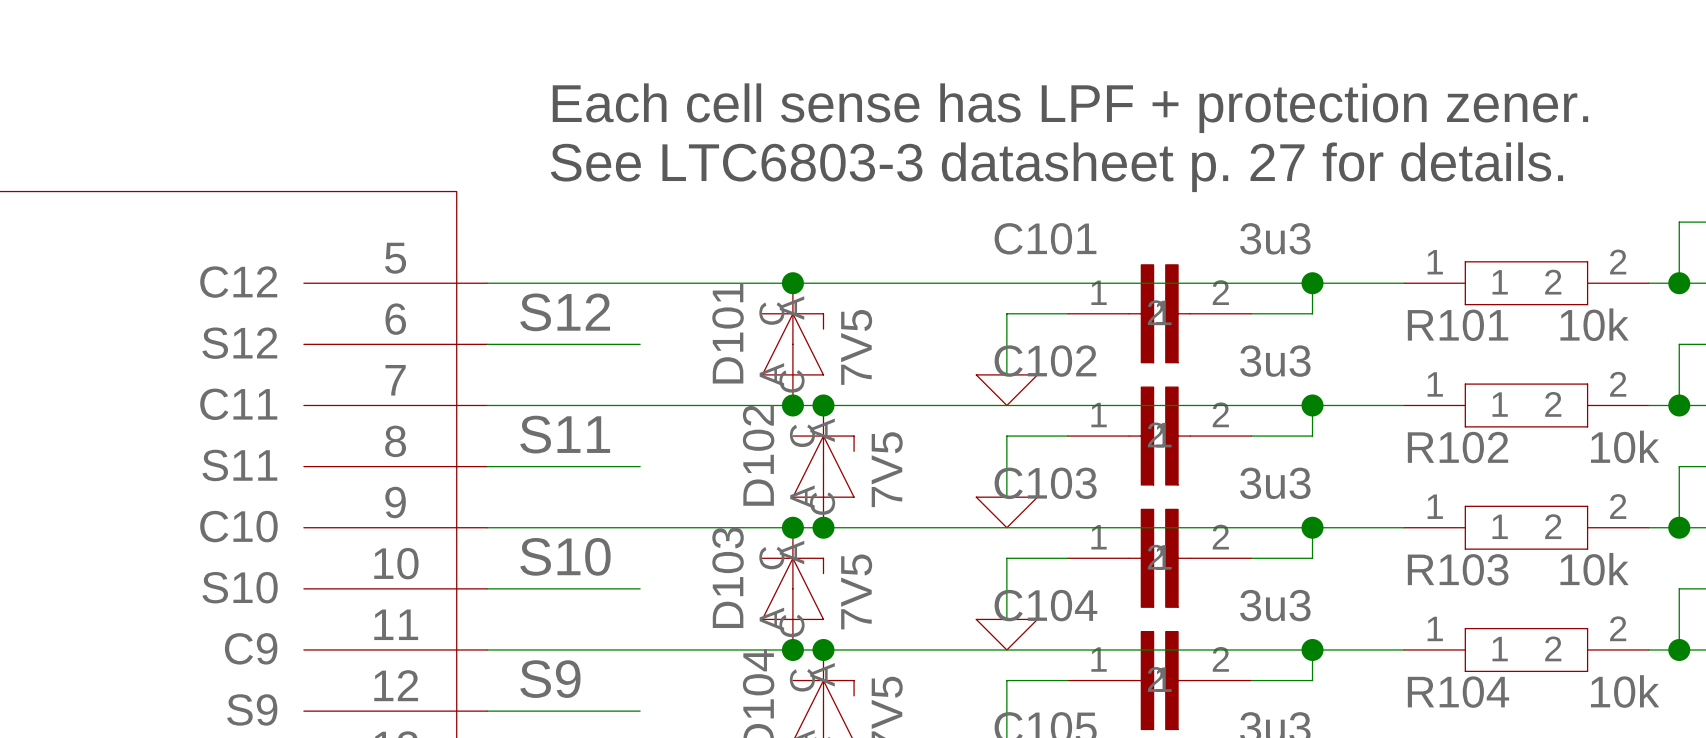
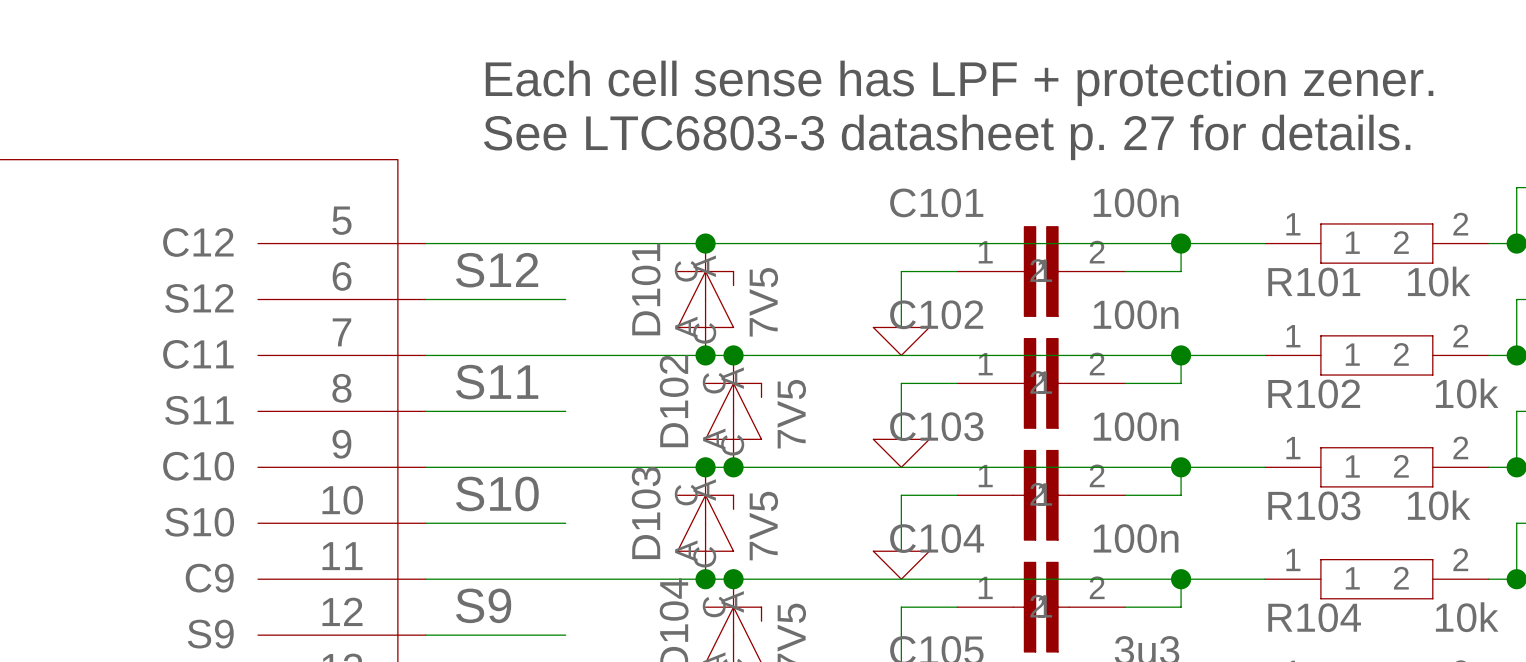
C101 value: 3u3 (1275, 238) -> 100n (1136, 202)
C102 value: 3u3 (1275, 361) -> 100n (1136, 314)
C103 value: 3u3 (1275, 483) -> 100n (1136, 426)
C104 value: 3u3 (1275, 605) -> 100n (1136, 538)

